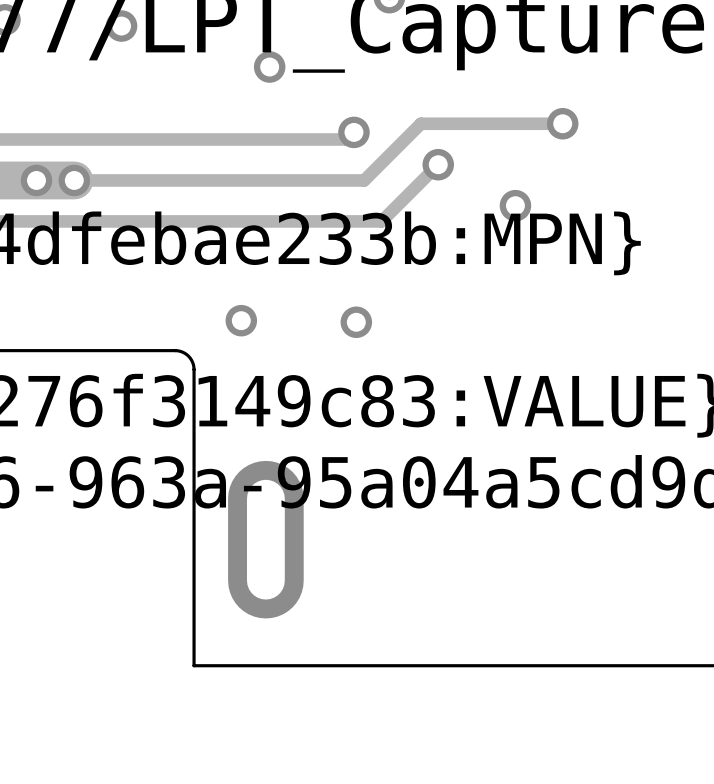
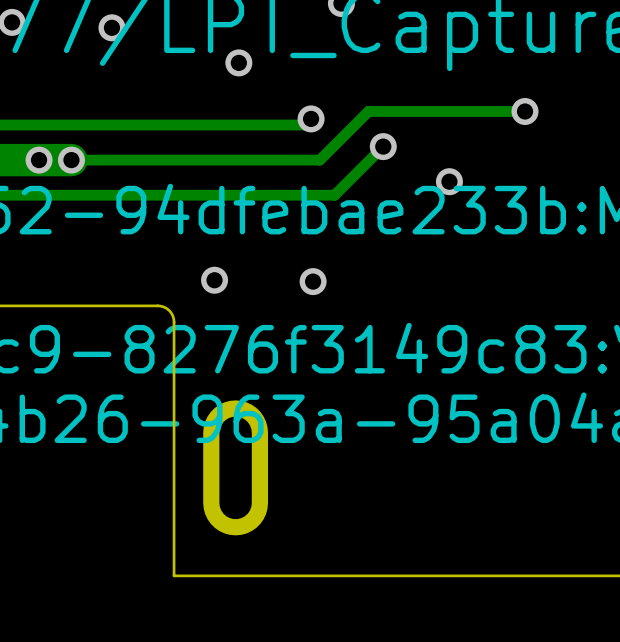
via position: (562, 123) -> (525, 111)
track: none -> (525, 111) (489, 111)

